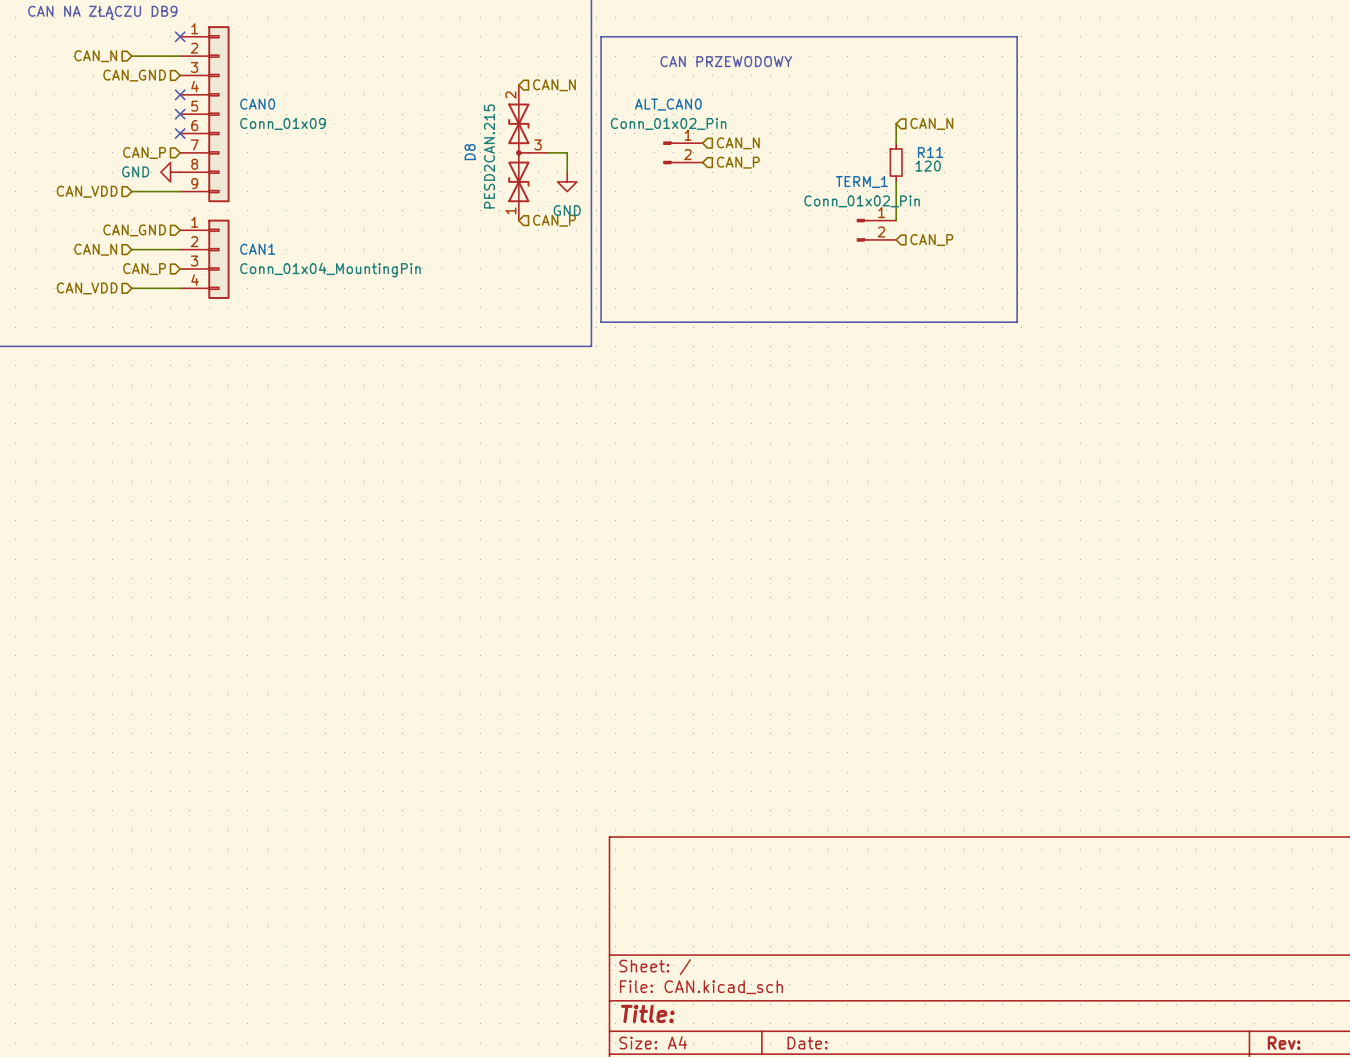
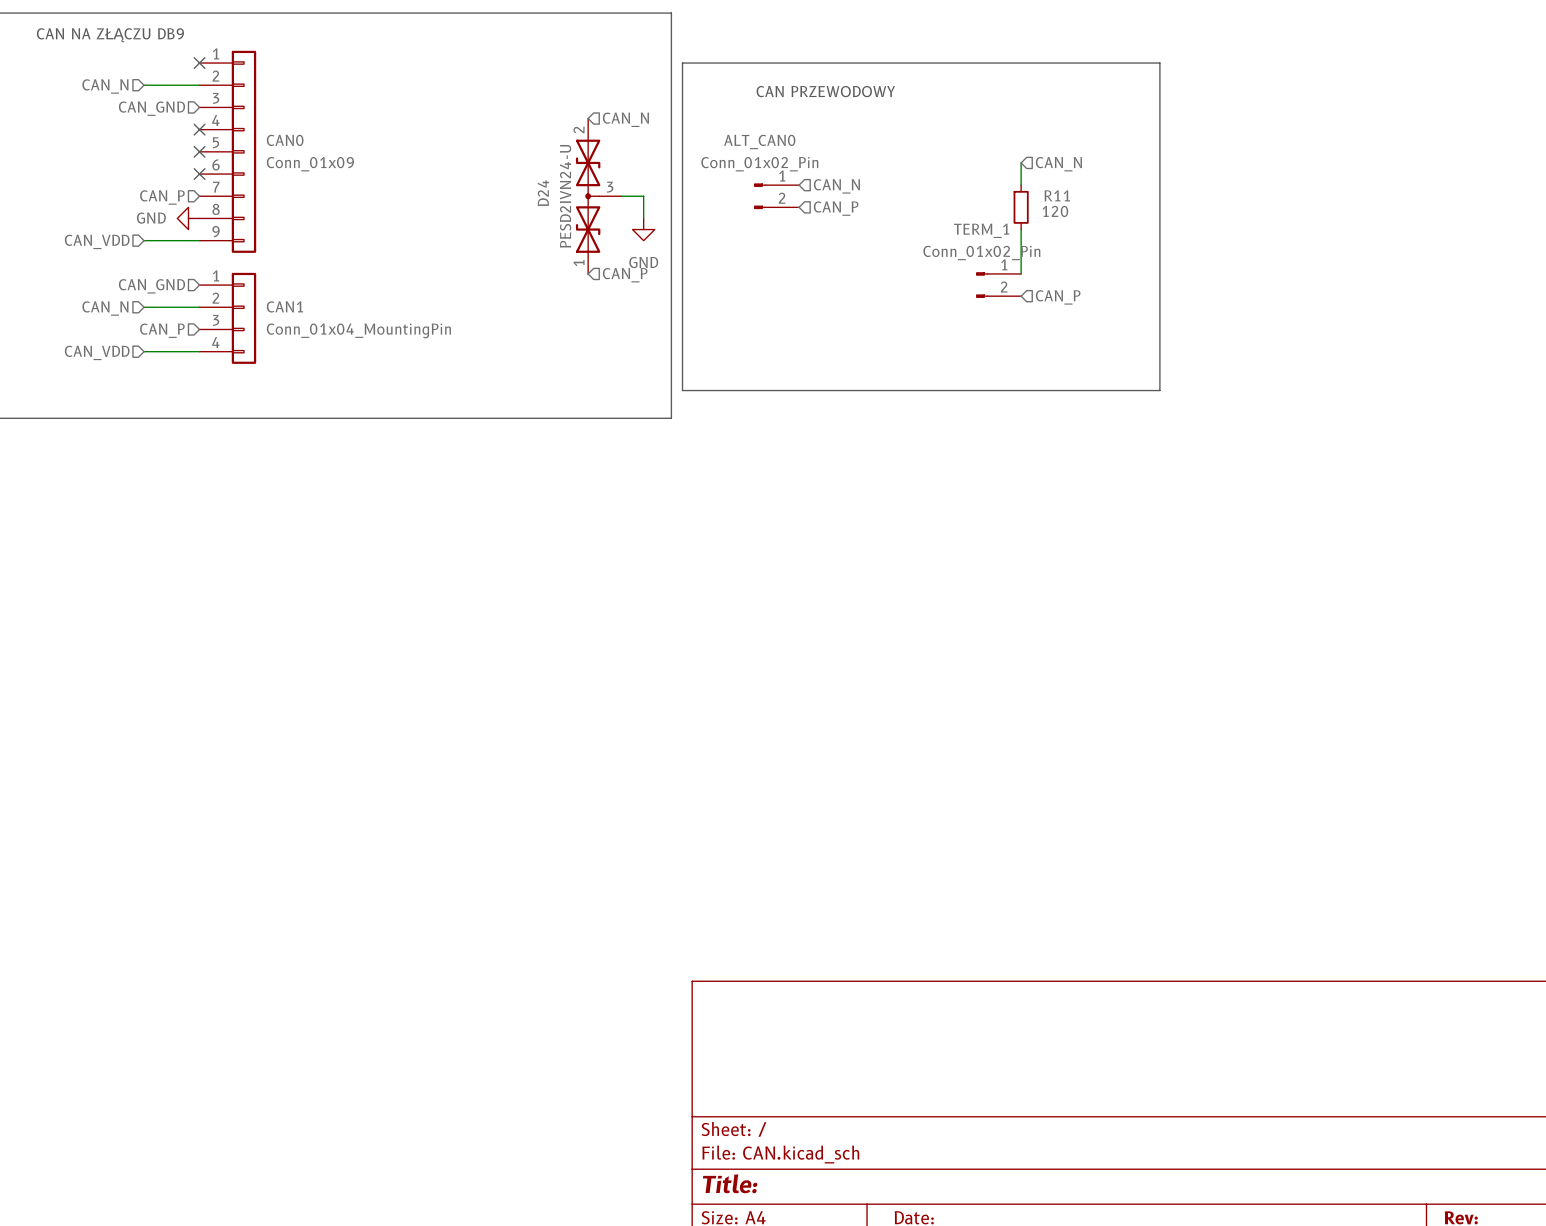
D8 name: D8 (470, 152) -> D24 (543, 193)
D8 value: PESD2CAN.215 (489, 156) -> PESD2IVN24-U (565, 196)

